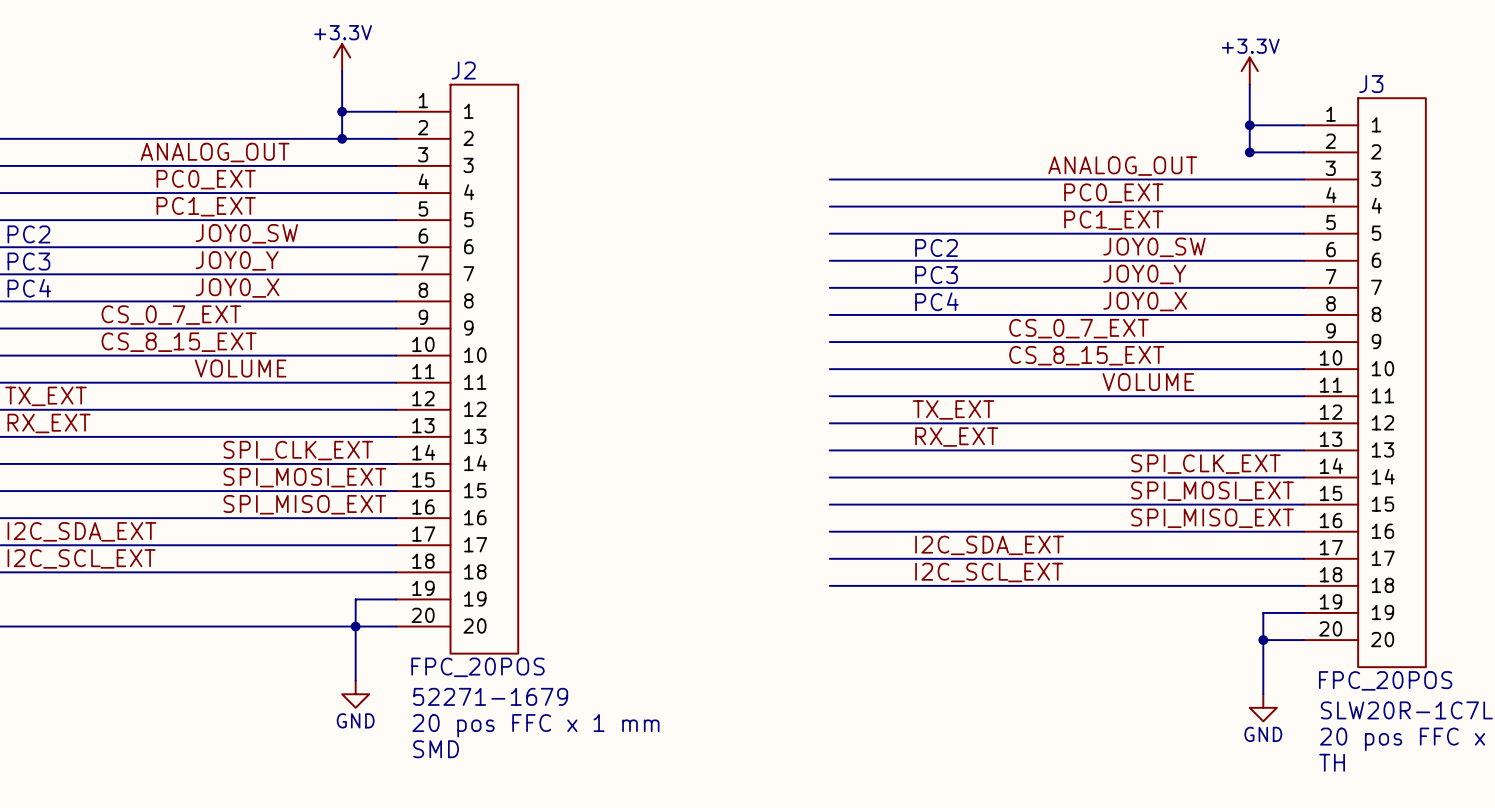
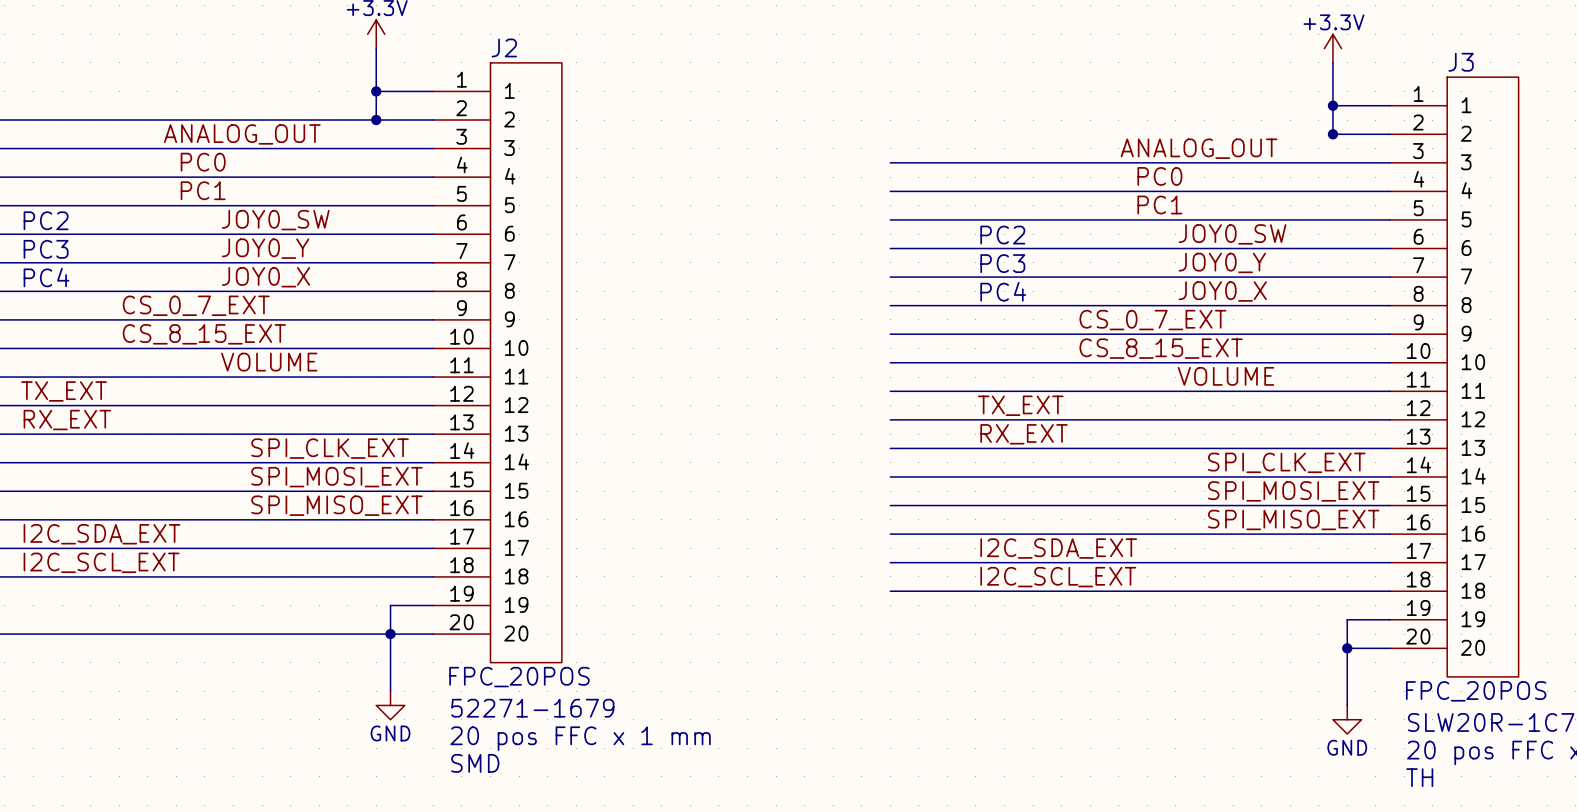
label: PC0_EXT (206, 179) -> PC0 (203, 162)
label: PC0_EXT (1113, 193) -> PC0 (1159, 176)
label: PC1_EXT (206, 206) -> PC1 (203, 190)
label: PC1_EXT (1113, 220) -> PC1 (1159, 205)

